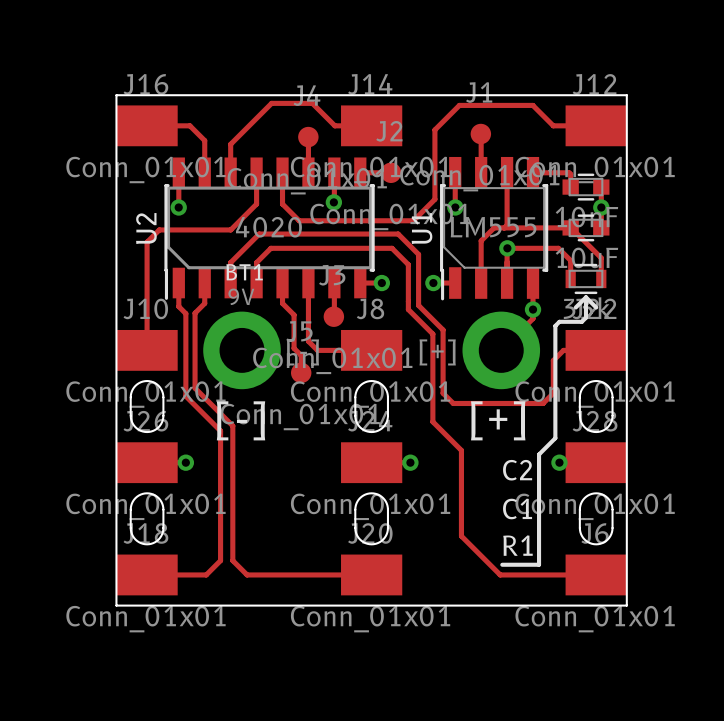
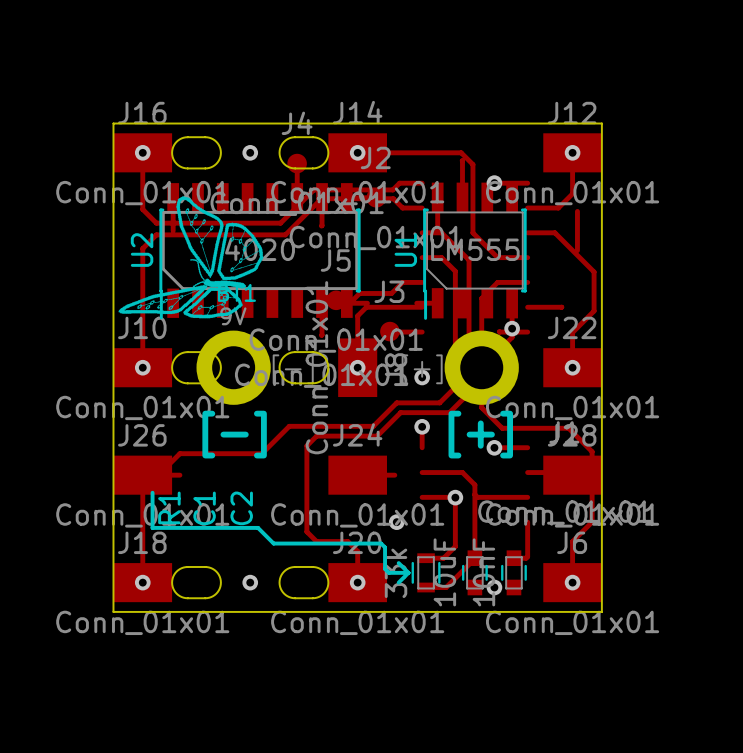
board edge: none -> (187, 137) (207, 137) (216, 141) (220, 152) (216, 163) (207, 168) (187, 168) (176, 163) (172, 156) (173, 146) (178, 140) (187, 137)
board edge: none -> (295, 137) (314, 137) (323, 141) (328, 152) (323, 163) (312, 168) (293, 168) (284, 163) (279, 154) (280, 146) (287, 139) (295, 137)
track: (147, 125) (189, 125) (204, 140) (204, 172) -> (142, 152) (142, 209) (156, 223) (280, 223) (313, 189) (392, 189) (399, 183) (422, 183)
via: none -> (142, 152)
via: none -> (250, 152)
track: (371, 125) (334, 125) (312, 103) (271, 103) (230, 144) (230, 172) -> (357, 152) (461, 152) (472, 164) (472, 232) (497, 257) (527, 257)
via: none -> (357, 152)
track: (596, 125) (553, 125) (532, 105) (459, 105) (434, 129) (434, 199) (413, 220) (299, 220) (282, 204) (282, 172) -> (572, 152) (572, 193) (558, 208) (527, 208)
via: none -> (572, 152)
J1 position: (480, 134) -> (564, 472)
track: none -> (494, 183) (527, 183)
via: none -> (494, 183)
drawing: none -> [118, 196, 264, 319]
track: (256, 172) (256, 204) (230, 229) (159, 229) (147, 242) -> (422, 208) (402, 208) (393, 198) (321, 198) (285, 234) (156, 234) (142, 248) (142, 264)
track: (507, 172) (507, 225) (504, 227) -> none
track: (533, 172) (569, 172) (570, 187) -> none
C2 rotation: 0° (585, 187) -> 90° clockwise (513, 572)
C2 position: (585, 187) -> (513, 572)
via: (333, 202) -> none
via: (178, 207) -> none
via: (455, 207) -> none
via: (601, 207) -> none
C1 rotation: 0° (585, 227) -> 90° clockwise (474, 572)
C1 position: (585, 227) -> (474, 572)
via: (507, 248) -> none
track: none -> (422, 282) (402, 282) (391, 293) (359, 293) (352, 300) (336, 300)
track: (570, 278) (570, 260) (558, 248) (507, 248) (507, 283) -> none
R1 rotation: 0° (585, 278) -> 90° clockwise (426, 572)
R1 position: (585, 278) -> (426, 572)
track: (601, 278) (601, 258) (571, 227) (494, 227) (481, 240) (481, 283) -> none
track: (178, 283) (178, 306) (185, 313) (185, 396) (220, 430) (220, 560) (206, 574) (147, 574) -> (422, 257) (441, 257) (455, 271) (455, 387) (439, 402) (396, 402) (373, 426) (289, 426) (261, 453) (179, 453) (142, 490) (142, 582)
track: (204, 283) (204, 303) (195, 313) (195, 388) (232, 425) (232, 560) (247, 574) (371, 574) -> (422, 232) (441, 232) (469, 260) (469, 393) (449, 412) (400, 412) (377, 436) (316, 436) (306, 445) (306, 531) (316, 541) (347, 541) (357, 551) (357, 582)
track: (230, 283) (230, 262) (259, 234) (398, 234) (418, 254) (418, 305) (443, 329) (443, 393) (453, 403) (543, 403) (553, 393) (553, 360) (563, 350) (596, 350) -> (527, 232) (554, 232) (594, 271) (594, 311) (572, 332) (572, 367)
track: (256, 283) (256, 262) (270, 248) (392, 248) (408, 264) (408, 309) (432, 334) (432, 421) (461, 450) (461, 536) (500, 574) (596, 574) -> (527, 282) (497, 282) (481, 298) (481, 407) (502, 428) (568, 428) (592, 451) (592, 522) (572, 541) (572, 582)
track: (282, 283) (282, 303) (294, 314) (294, 348) (301, 355) (301, 372) -> none
track: (308, 283) (308, 341) (317, 350) (371, 350) -> (422, 307) (366, 307) (357, 315) (357, 367)
via: (381, 283) -> none
via: (433, 283) -> none
track: none -> (527, 307) (561, 307)
line: (585, 297) (596, 307) -> (398, 563) (408, 572)
line: (585, 297) (575, 307) -> (408, 572) (398, 582)
line: (585, 297) (585, 317) (581, 321) (559, 321) (555, 325) (555, 438) (539, 454) (539, 564) (502, 564) -> none
track: none -> (389, 331) (422, 332)
track: none -> (499, 331) (527, 332)
J3 position: (333, 316) -> (389, 331)
board edge: none -> (187, 352) (207, 352) (216, 356) (220, 367) (216, 378) (205, 383) (185, 383) (176, 378) (172, 371) (173, 361) (178, 355) (187, 352)
board edge: none -> (295, 352) (314, 352) (323, 356) (328, 367) (323, 378) (312, 383) (293, 383) (284, 378) (279, 369) (280, 361) (287, 354) (295, 352)
via: none -> (142, 367)
J8 rotation: 0° (371, 350) -> 90° clockwise (357, 367)
via: none -> (357, 367)
via: none -> (572, 367)
via: none -> (422, 377)
J5 position: (301, 372) -> (336, 300)
board edge: (130, 397) (130, 417) (135, 427) (147, 432) (158, 427) (163, 415) (163, 395) (158, 385) (149, 381) (140, 382) (132, 389) (130, 397) -> none
board edge: (355, 397) (355, 417) (360, 427) (371, 432) (383, 427) (387, 415) (387, 395) (383, 385) (373, 381) (365, 382) (357, 389) (355, 397) -> none
board edge: (579, 397) (580, 417) (584, 427) (596, 432) (607, 427) (612, 415) (612, 395) (607, 385) (598, 381) (589, 382) (582, 389) (579, 397) -> none
track: none -> (422, 426) (422, 447)
via: none -> (422, 426)
track: none -> (494, 447) (527, 447)
via: none -> (494, 447)
track: none -> (422, 472) (462, 472) (474, 484) (474, 558) (446, 587) (426, 587)
track: none -> (564, 472) (527, 472)
via: (185, 462) -> none
via: (410, 462) -> none
via: (559, 462) -> none
line: none -> (152, 492) (152, 527) (258, 527) (273, 543) (381, 543) (385, 547) (385, 568) (388, 572) (408, 572)
track: none -> (474, 494) (477, 497) (527, 497)
track: none -> (422, 497) (455, 497) (455, 546) (443, 558) (426, 558)
via: none -> (455, 497)
board edge: (130, 509) (130, 530) (135, 539) (147, 544) (158, 539) (163, 528) (163, 507) (158, 498) (149, 493) (140, 494) (132, 501) (130, 509) -> none
board edge: (355, 509) (355, 530) (360, 539) (371, 544) (383, 539) (387, 528) (387, 507) (383, 498) (373, 493) (365, 494) (357, 501) (355, 509) -> none
board edge: (579, 509) (580, 530) (584, 539) (596, 544) (607, 539) (612, 528) (612, 507) (607, 498) (598, 493) (589, 494) (582, 501) (579, 509) -> none
via: none -> (396, 522)
track: none -> (527, 522) (527, 556) (513, 558)
board edge: none -> (187, 566) (207, 567) (216, 571) (220, 582) (216, 593) (205, 598) (185, 598) (176, 593) (172, 586) (173, 576) (178, 570) (187, 566)
board edge: none -> (295, 566) (314, 567) (323, 571) (328, 582) (323, 593) (314, 598) (295, 598) (284, 593) (279, 584) (280, 576) (287, 569) (295, 566)
via: none -> (142, 582)
via: none -> (250, 582)
via: none -> (357, 582)
via: none -> (572, 582)
via: none -> (494, 587)

